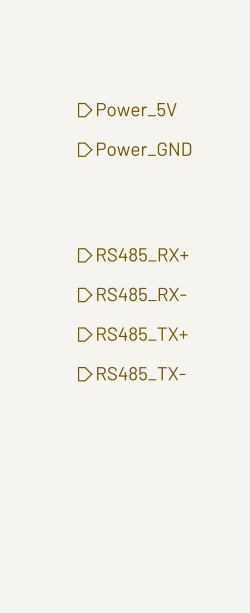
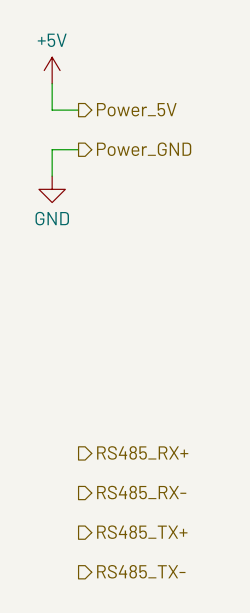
power symbol: none -> +5V (52, 70)
wire: none -> (52, 83) (52, 110) (78, 110)
wire: none -> (78, 149) (52, 149) (52, 176)
power symbol: none -> GND (52, 189)
hierarchical label position: RS485_RX+ (142, 254) -> RS485_RX+ (142, 452)
hierarchical label position: RS485_RX- (141, 294) -> RS485_RX- (141, 492)
hierarchical label position: RS485_TX+ (142, 334) -> RS485_TX+ (142, 532)
hierarchical label position: RS485_TX- (141, 373) -> RS485_TX- (141, 571)

